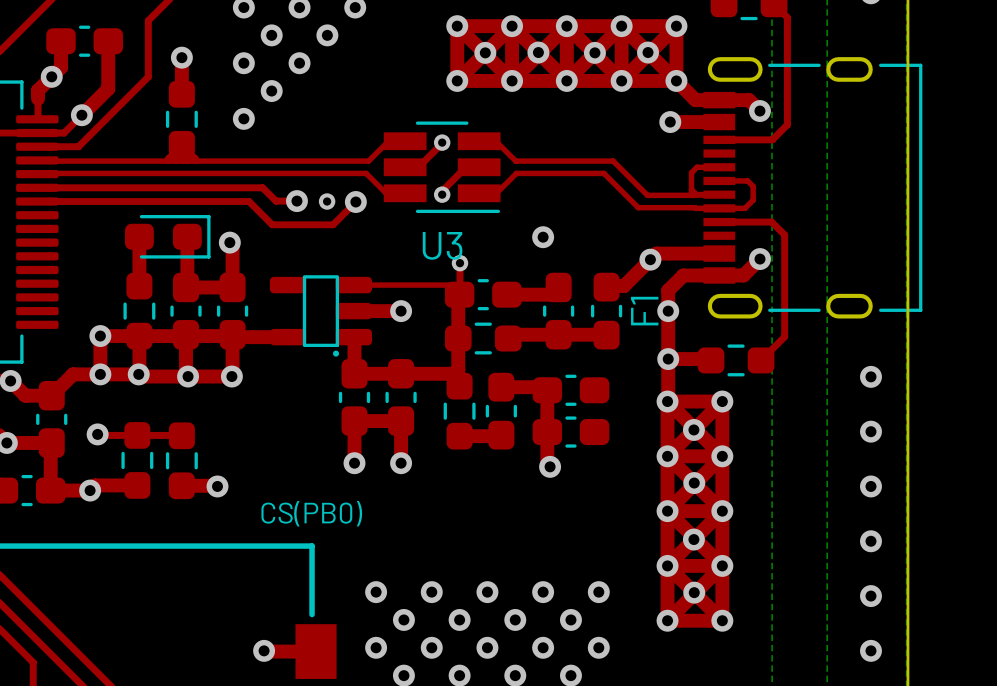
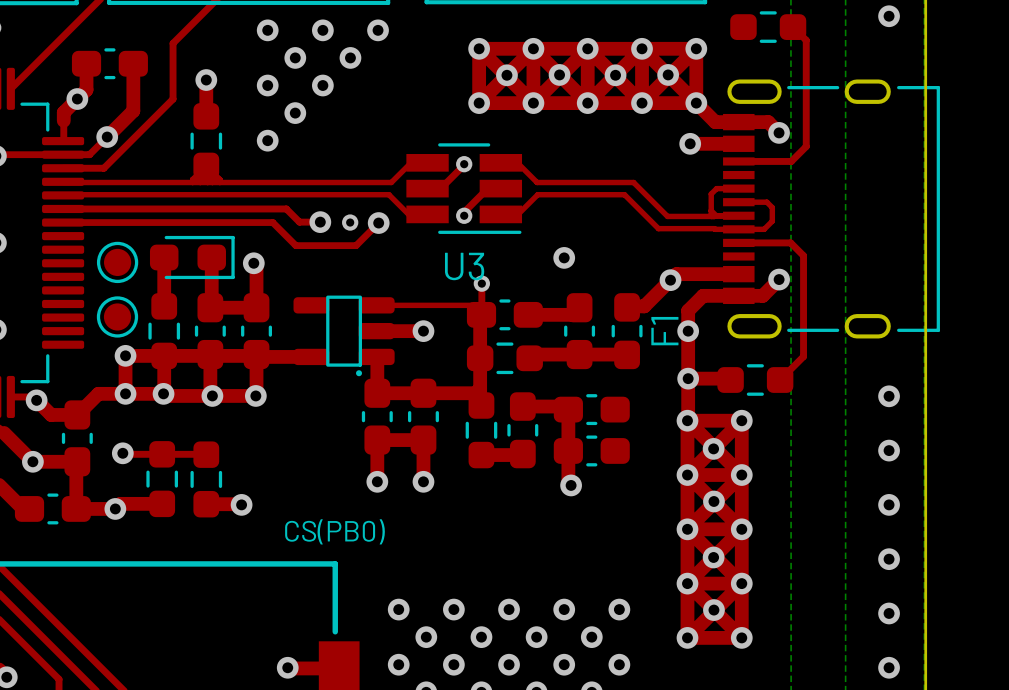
part: none -> (117, 262)
part: none -> (117, 316)

